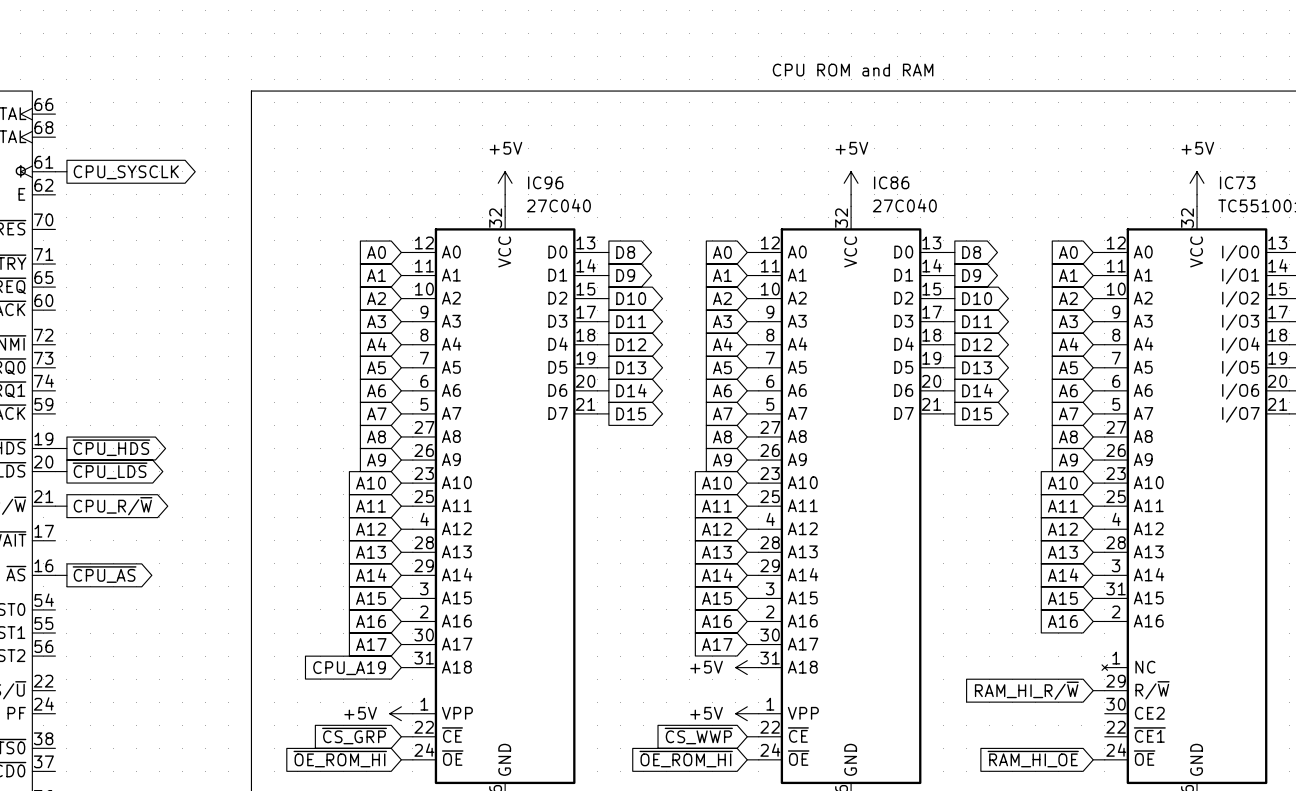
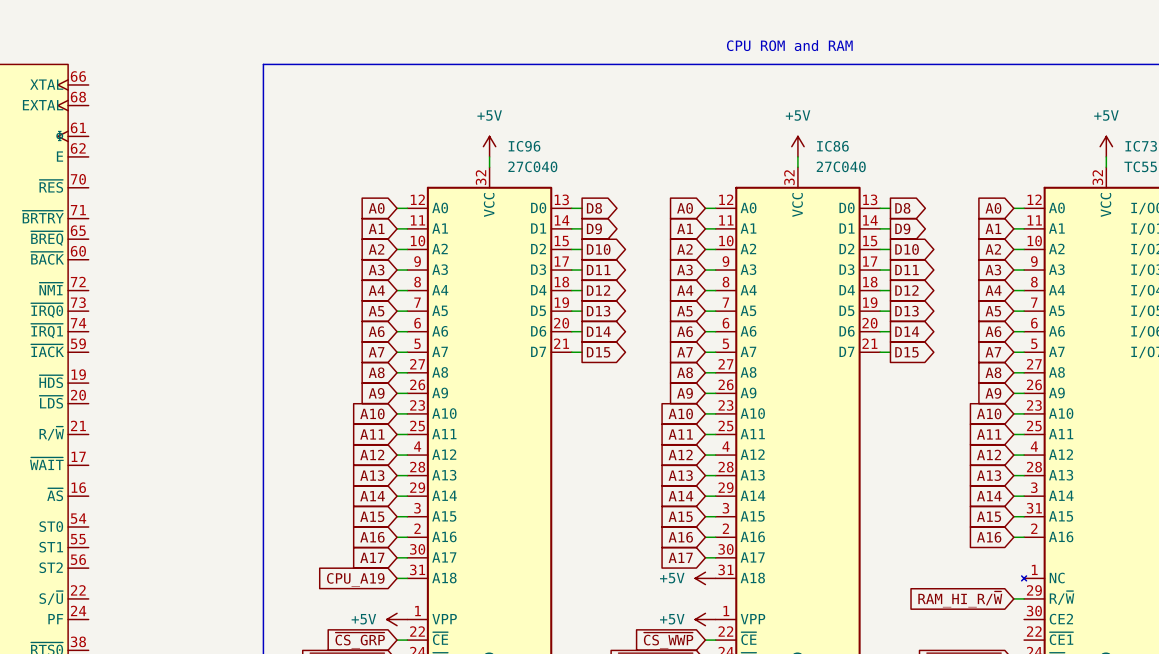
wire: (55, 171) (66, 171) -> none
global label: CPU_SYSCLK (126, 172) -> none
global label: ~{CPU_HDS} (111, 447) -> none
wire: (55, 448) (66, 448) -> none
global label: ~{CPU_LDS} (110, 470) -> none
wire: (55, 471) (66, 471) -> none
wire: (55, 506) (66, 506) -> none
global label: CPU_R/~{W} (113, 506) -> none
global label: ~{CPU_AS} (104, 574) -> none
wire: (55, 575) (66, 575) -> none

